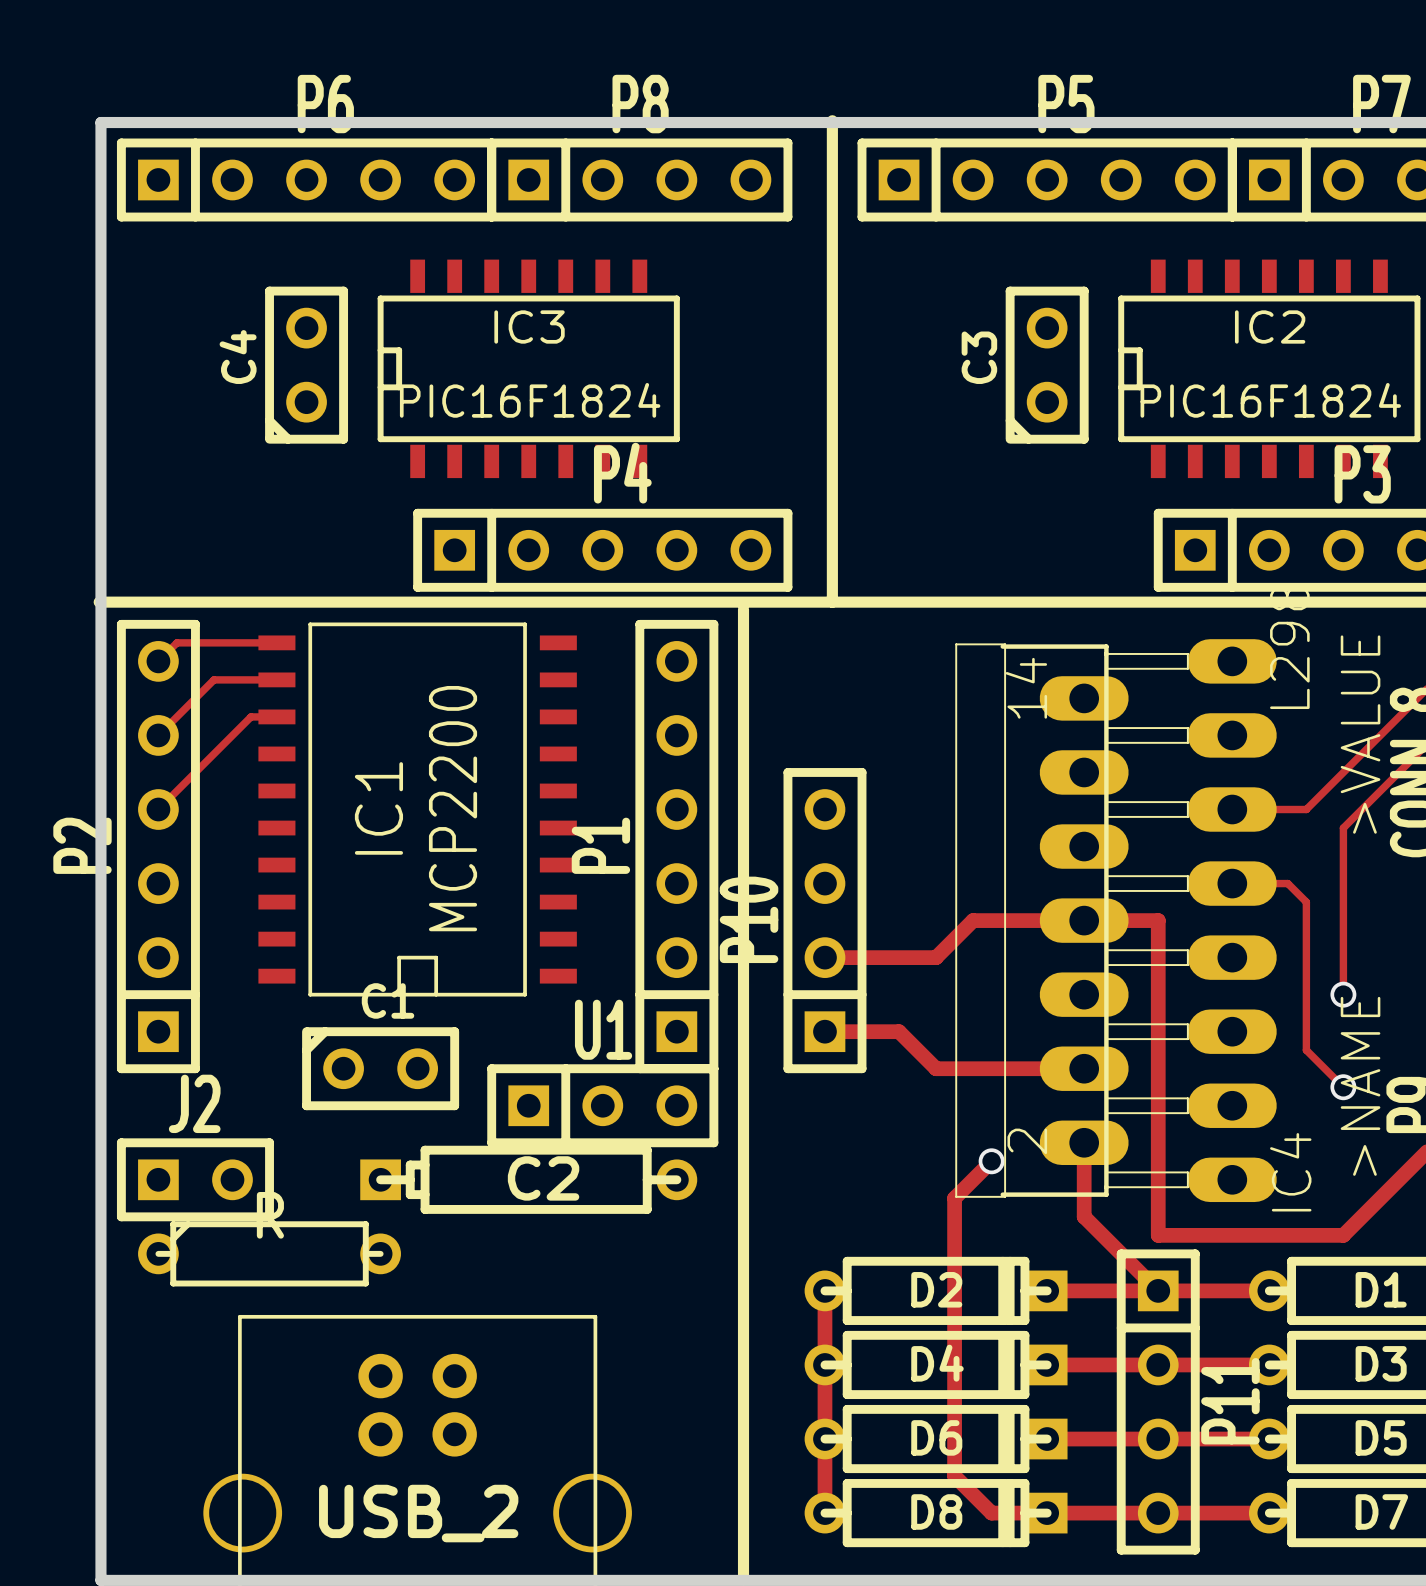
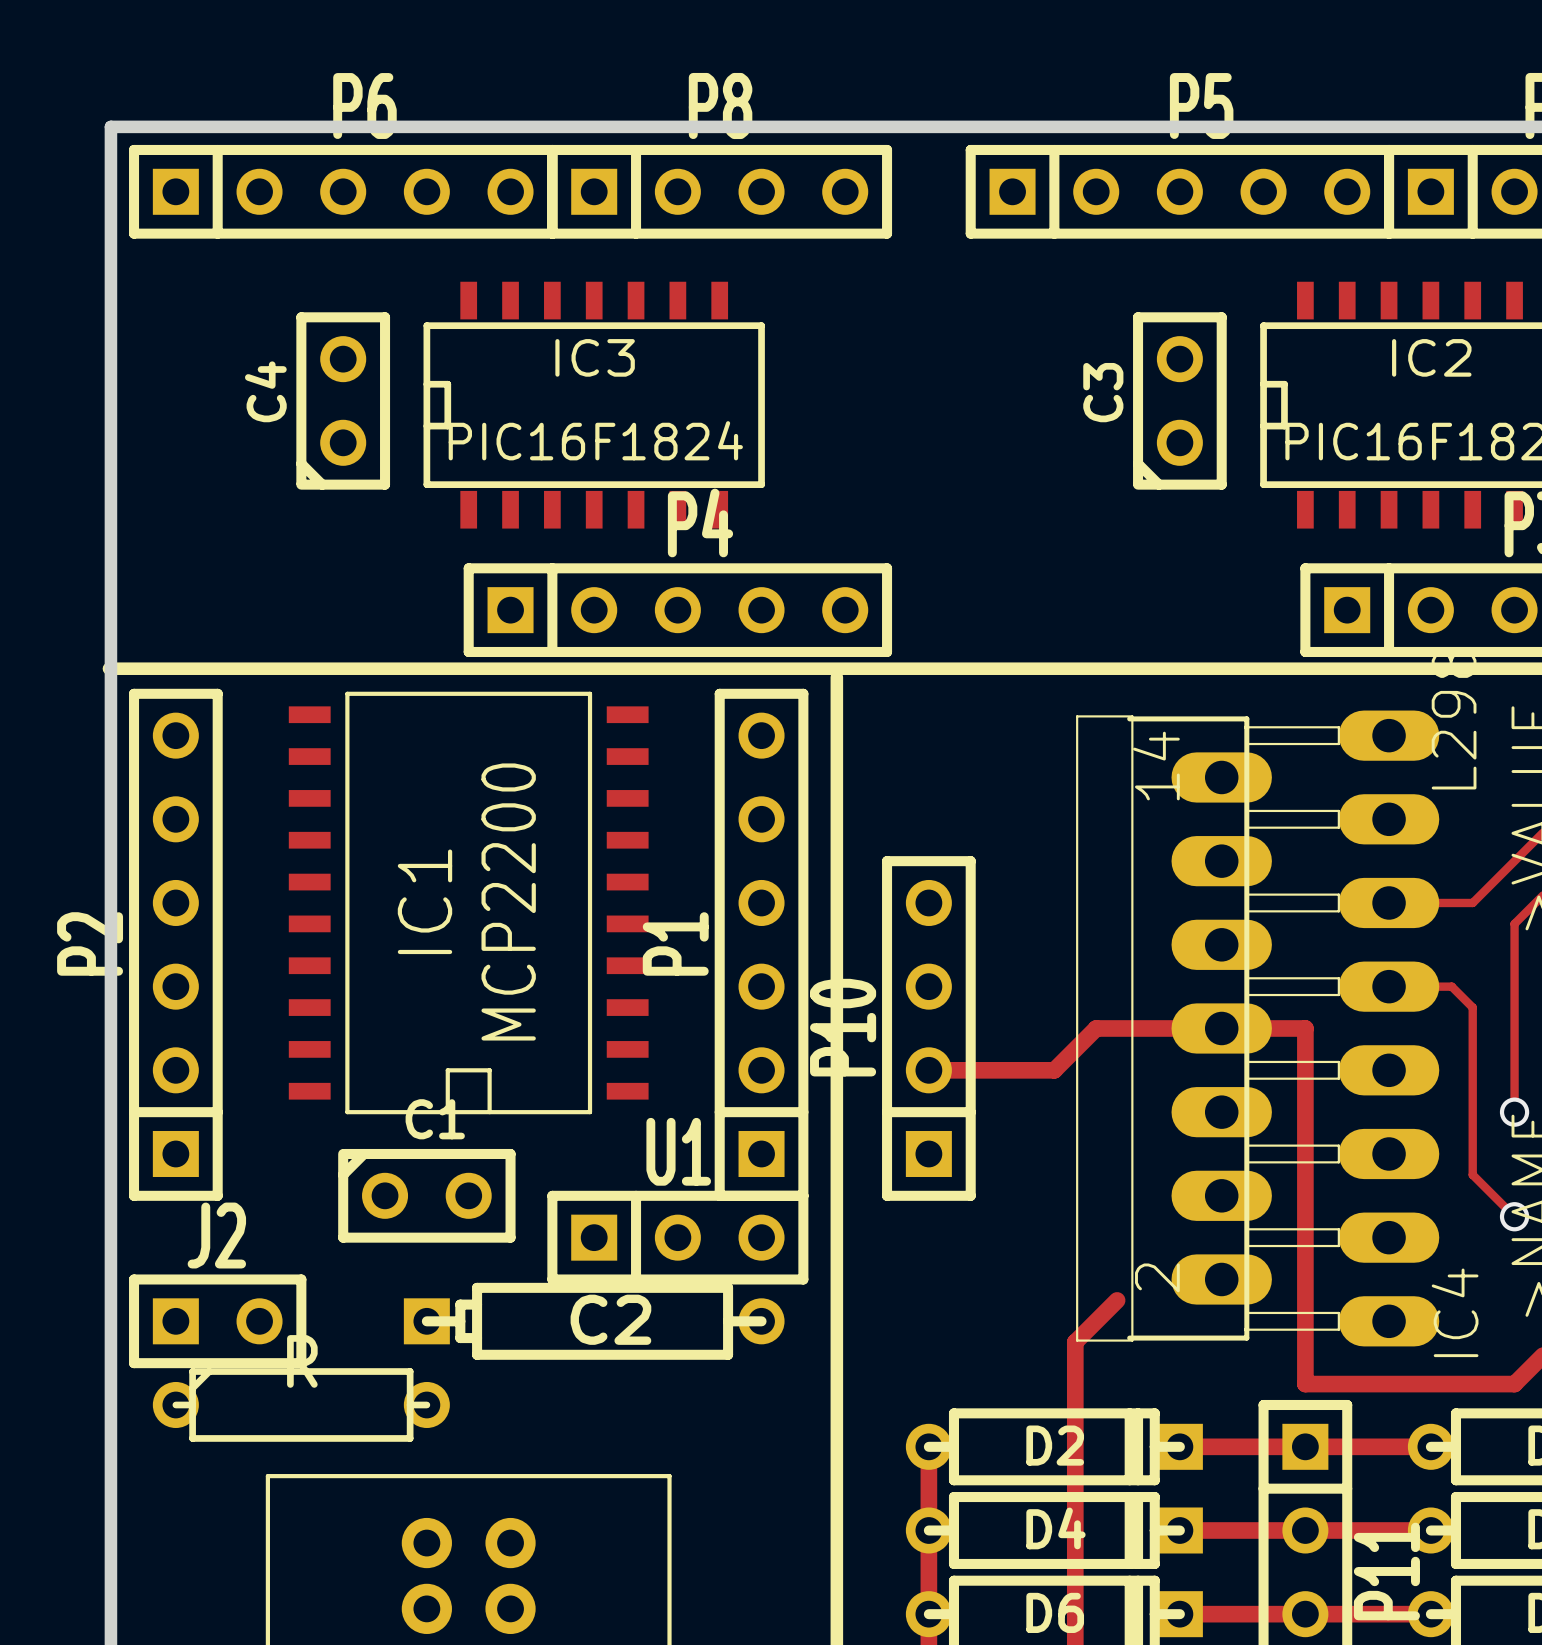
line: (832, 120) (832, 602) -> none
track: (276, 642) (176, 642) (158, 661) -> none
track: (276, 679) (213, 679) (158, 735) -> none
track: (276, 716) (251, 716) (158, 809) -> none
track: (824, 1031) (899, 1031) (936, 1068) (1084, 1068) -> none
track: (1084, 1142) (1084, 1216) (1158, 1290) -> none
via: (991, 1161) -> none

